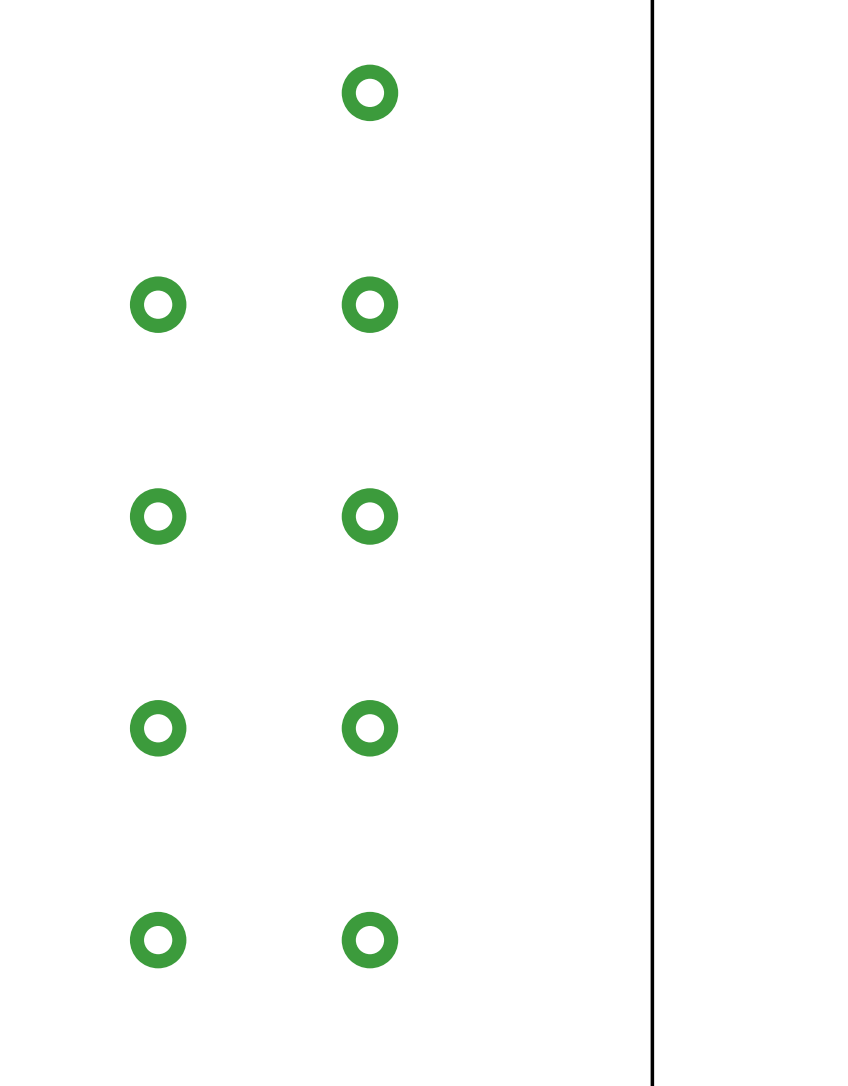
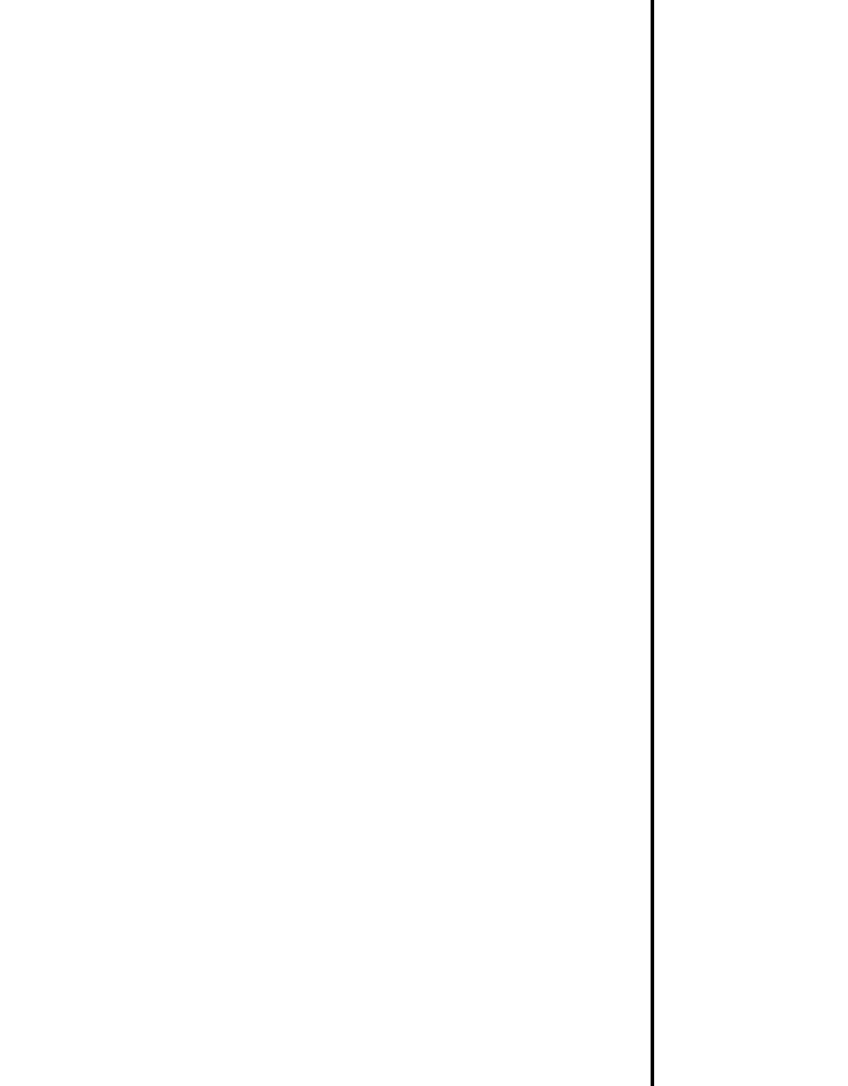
via: (369, 92) -> none
via: (158, 304) -> none
via: (369, 304) -> none
via: (158, 516) -> none
via: (369, 516) -> none
via: (158, 728) -> none
via: (369, 728) -> none
via: (158, 940) -> none
via: (369, 940) -> none

